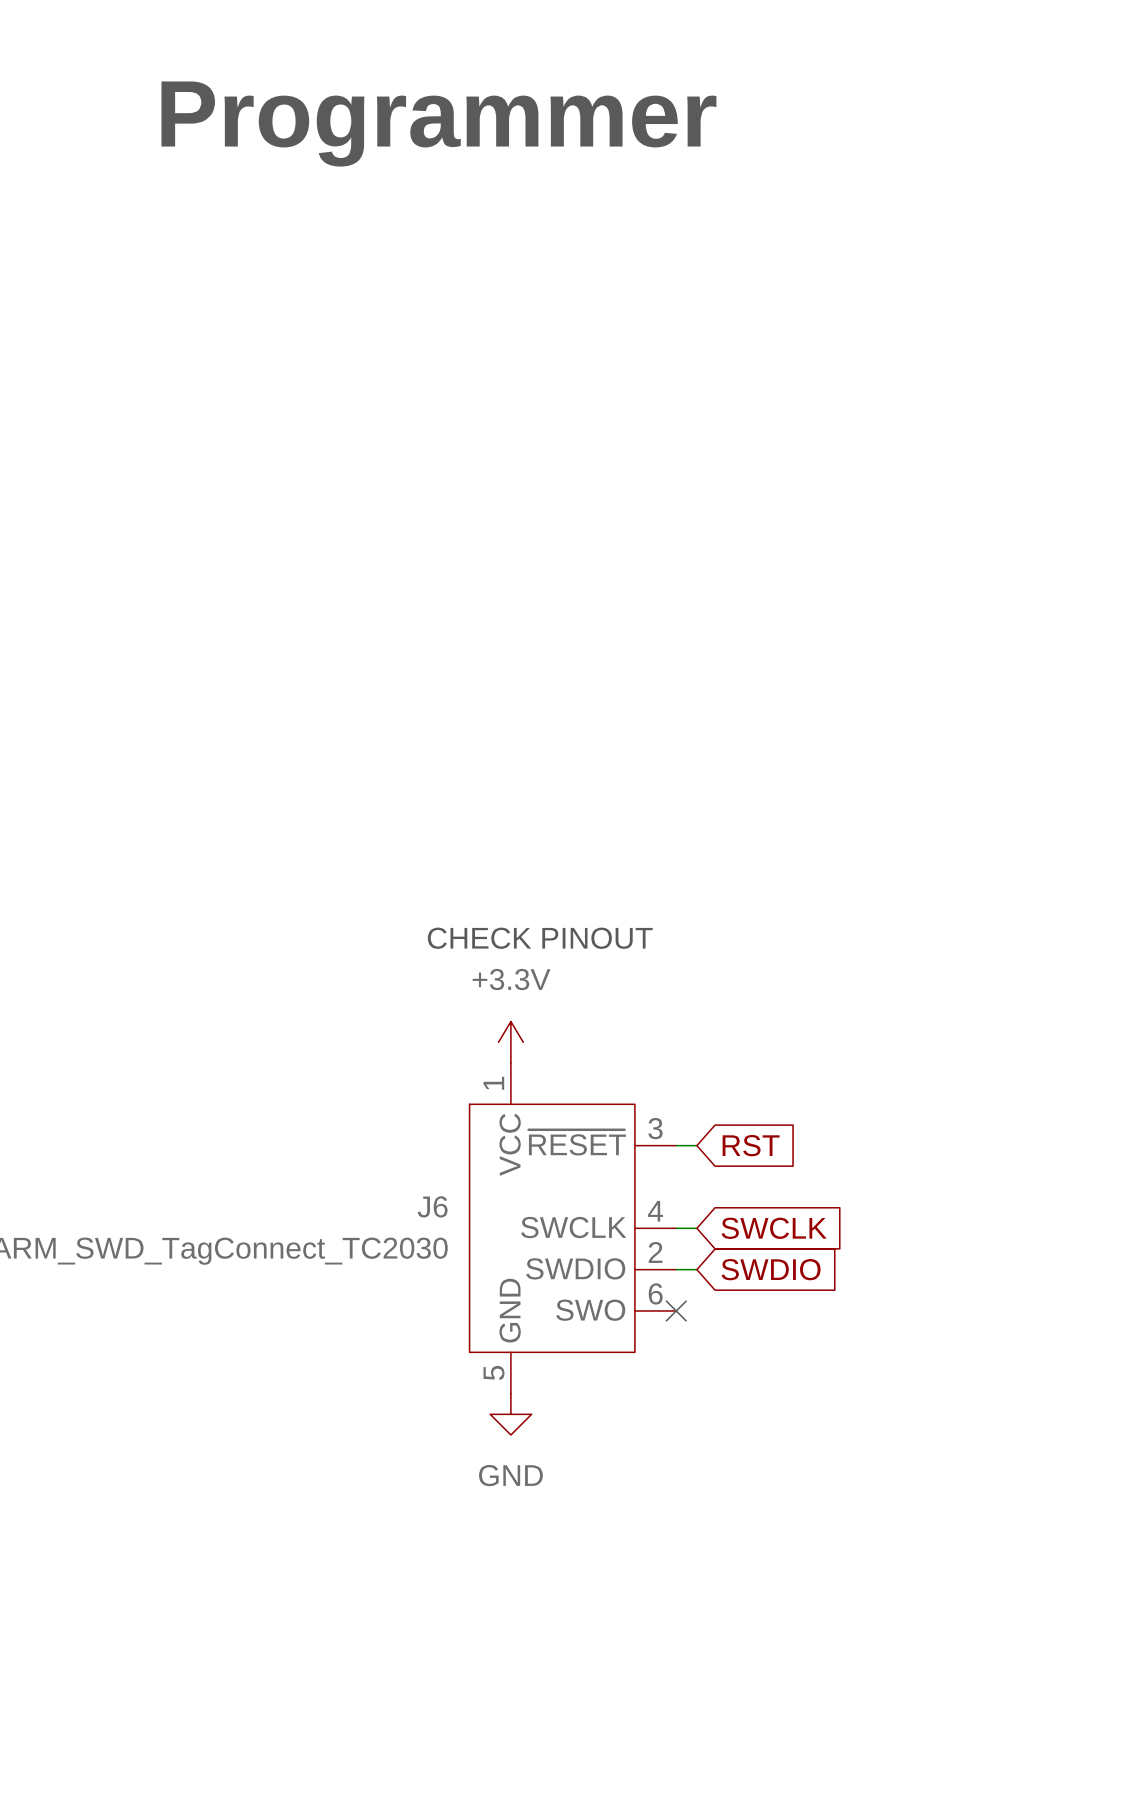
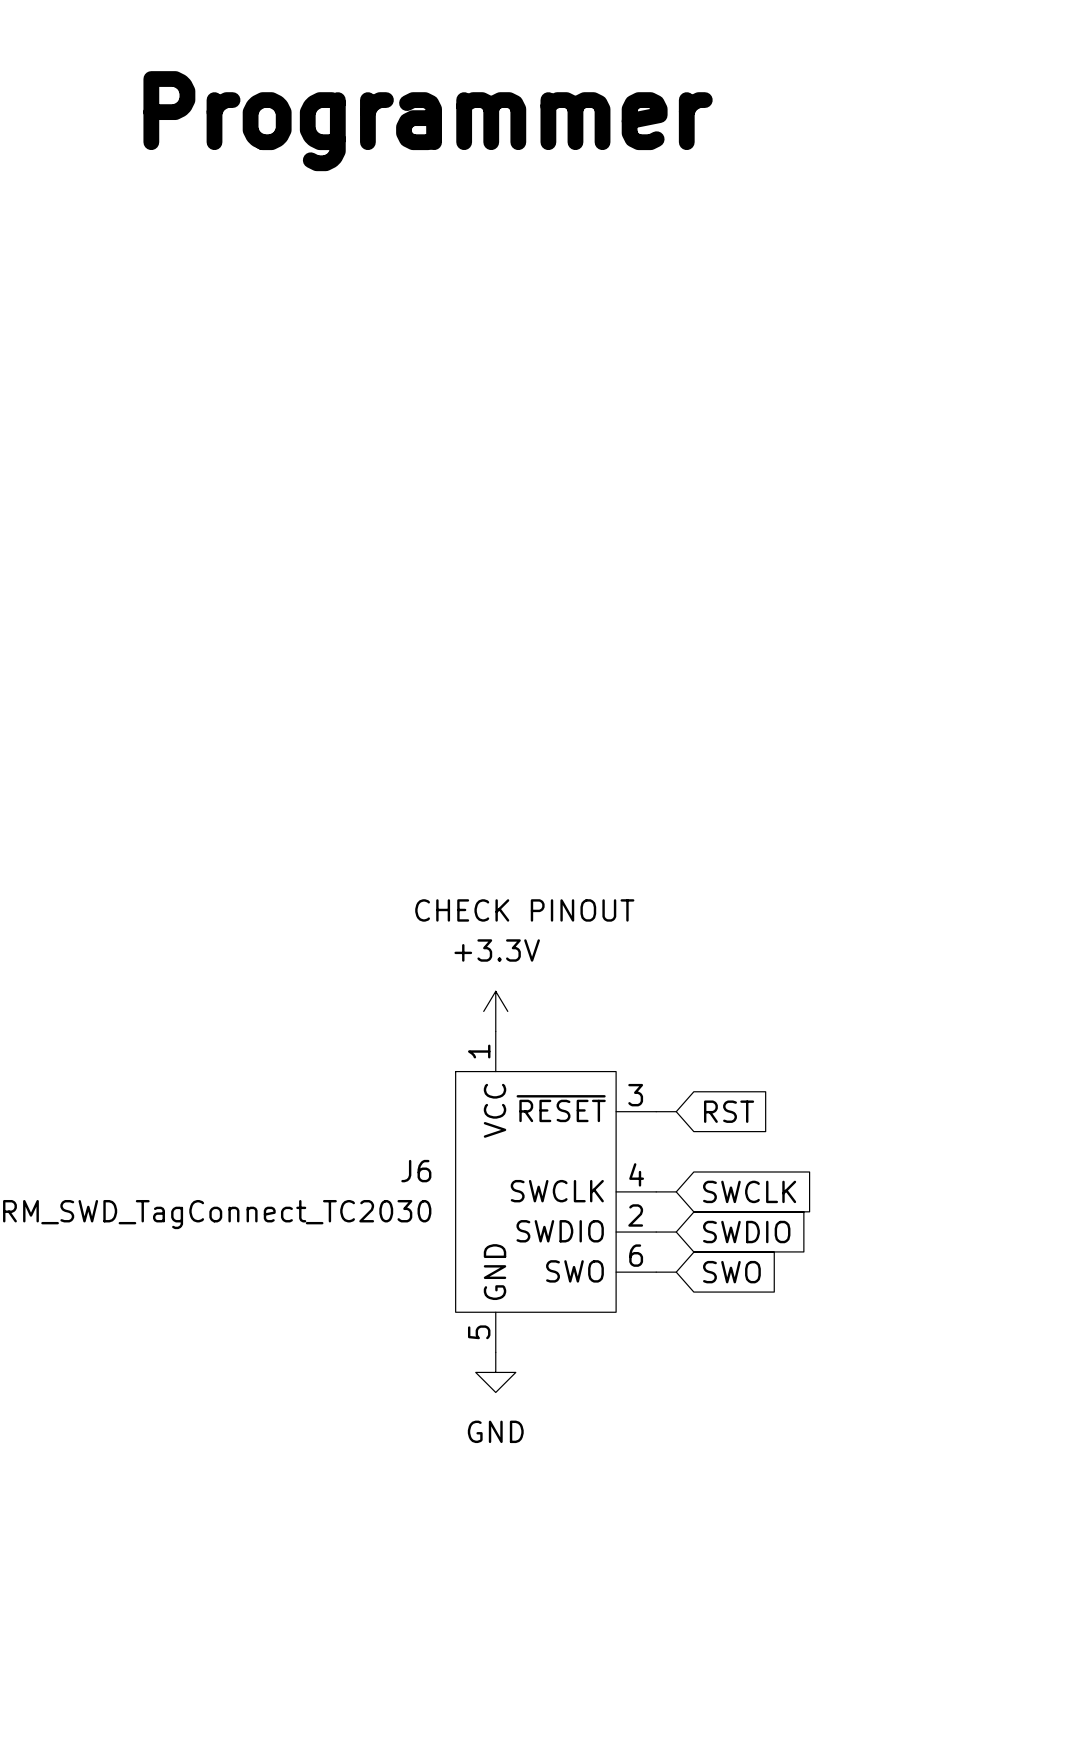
wire: none -> (656, 1272) (676, 1272)
no-connect mark: (676, 1310) -> none
global label: none -> SWO (731, 1272)

